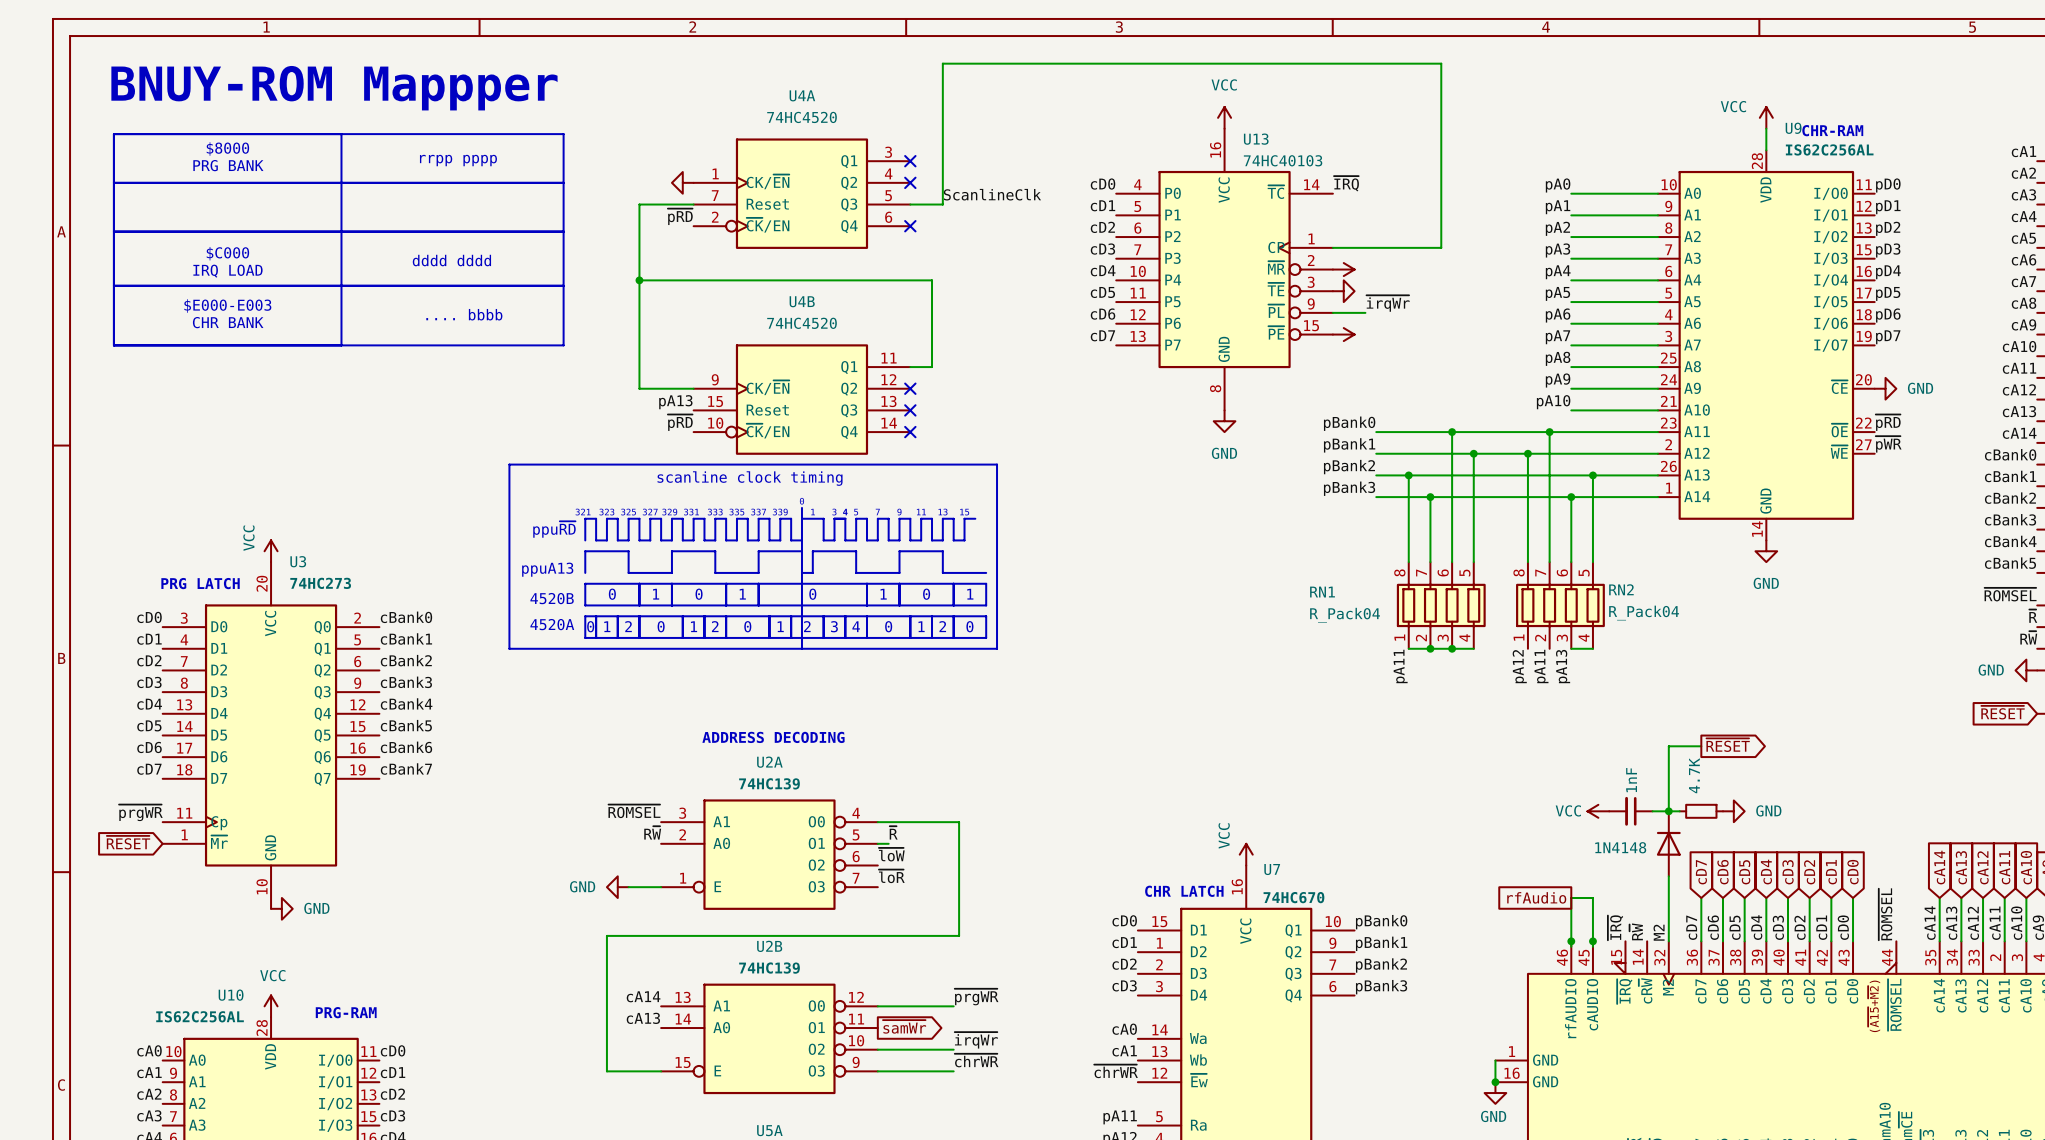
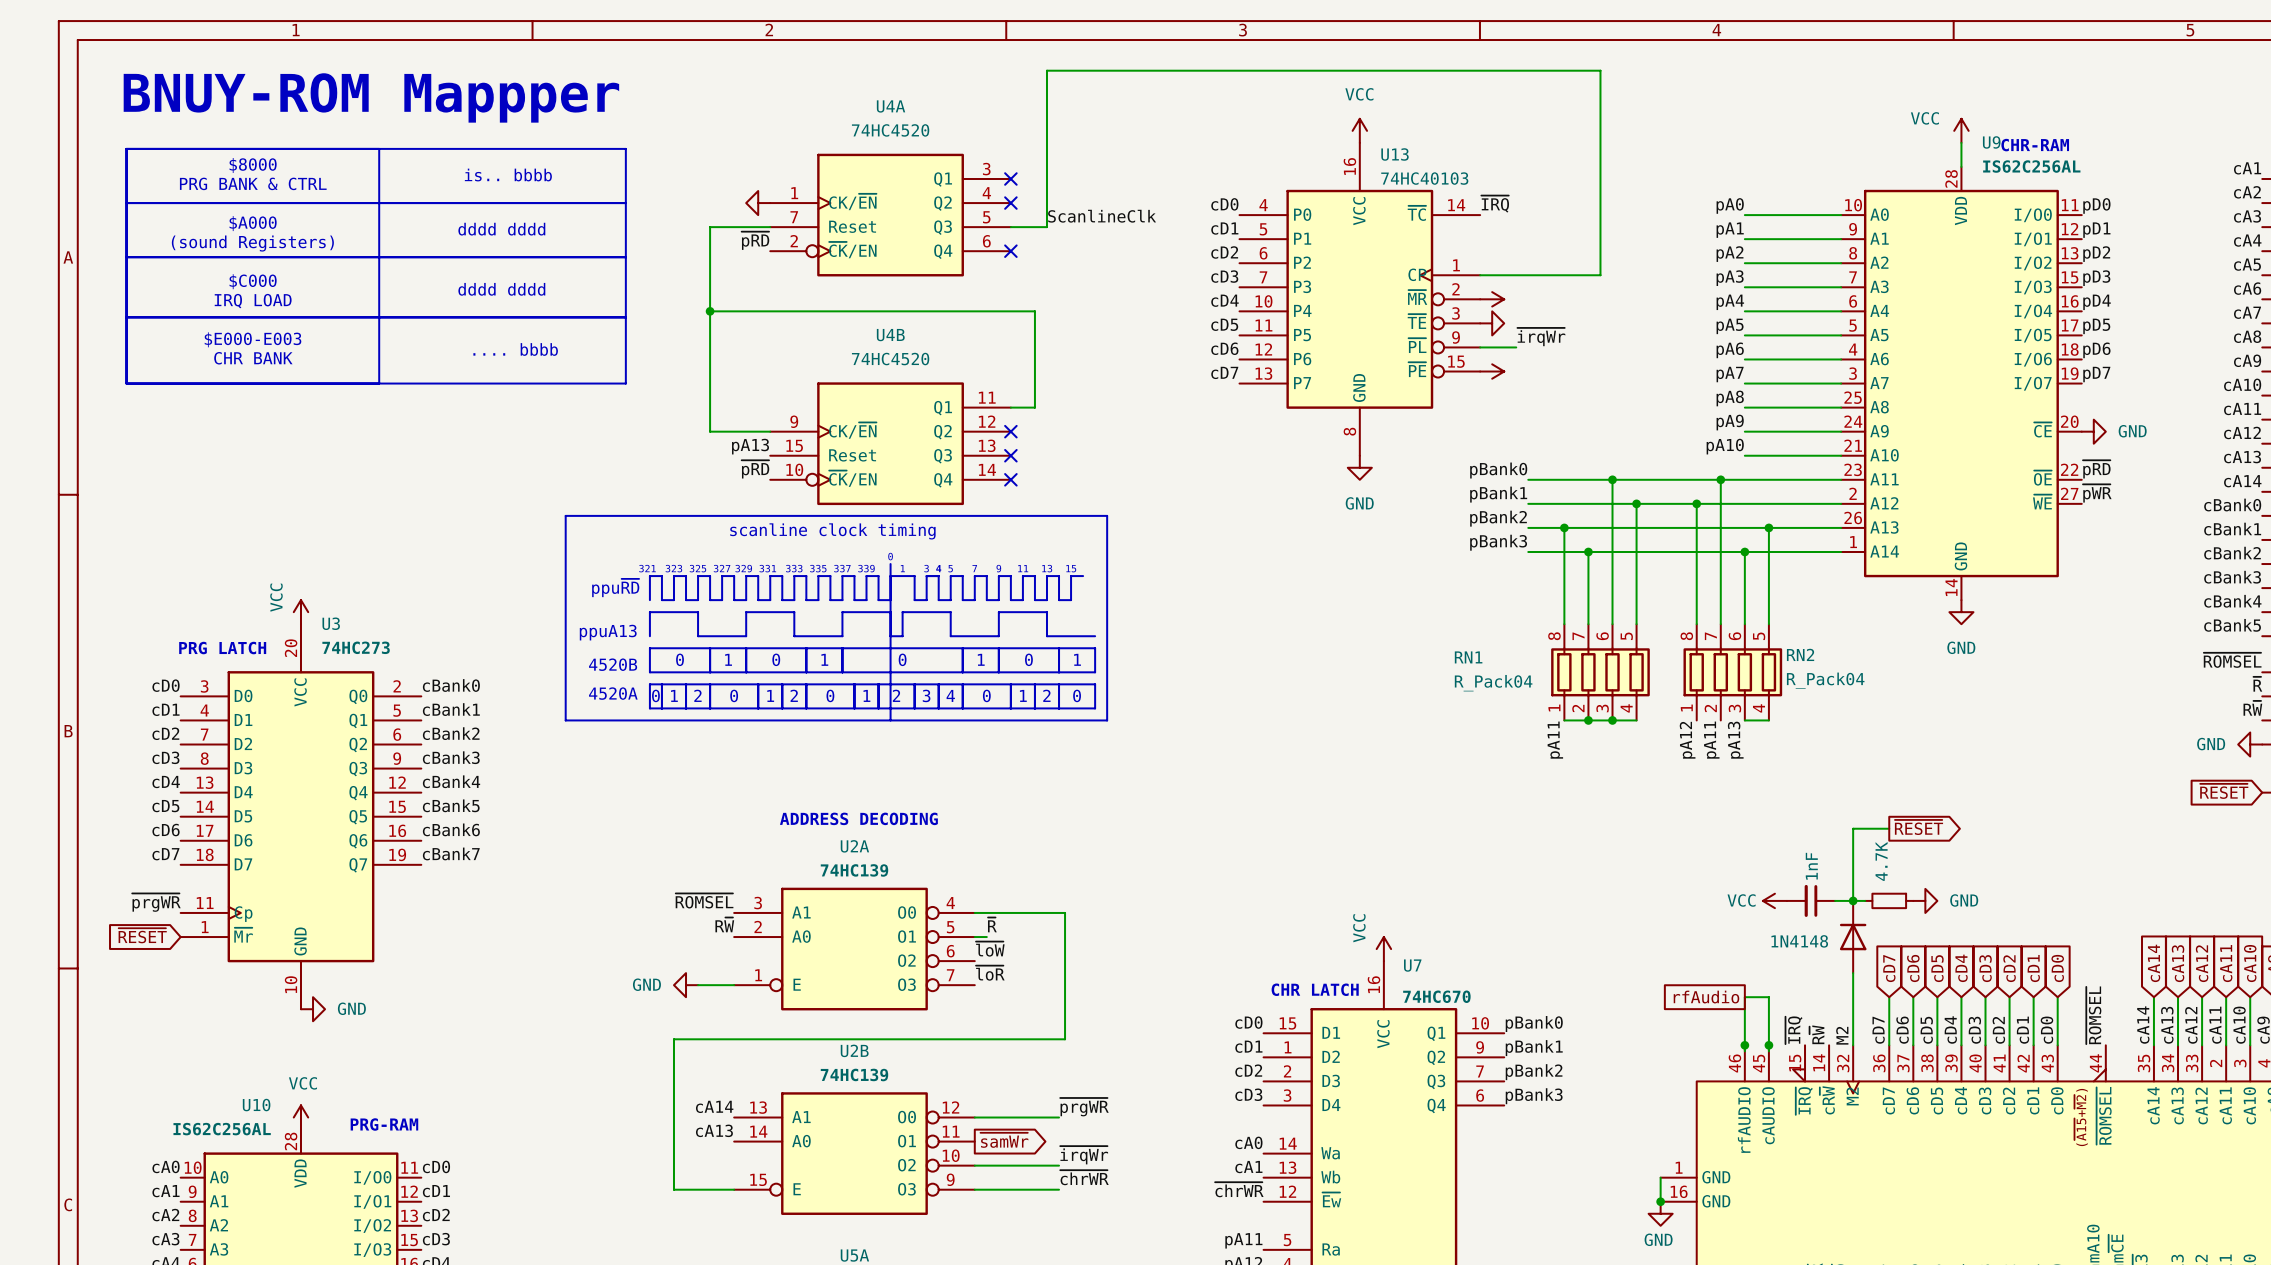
text: rrpp pppp (458, 160) -> is.. bbbb (508, 175)
text: PRG BANK (228, 165) -> PRG BANK & CTRL (253, 183)
text: none -> $A000 (253, 223)
text: none -> dddd dddd (501, 229)
text: none -> (sound Registers) (252, 243)

